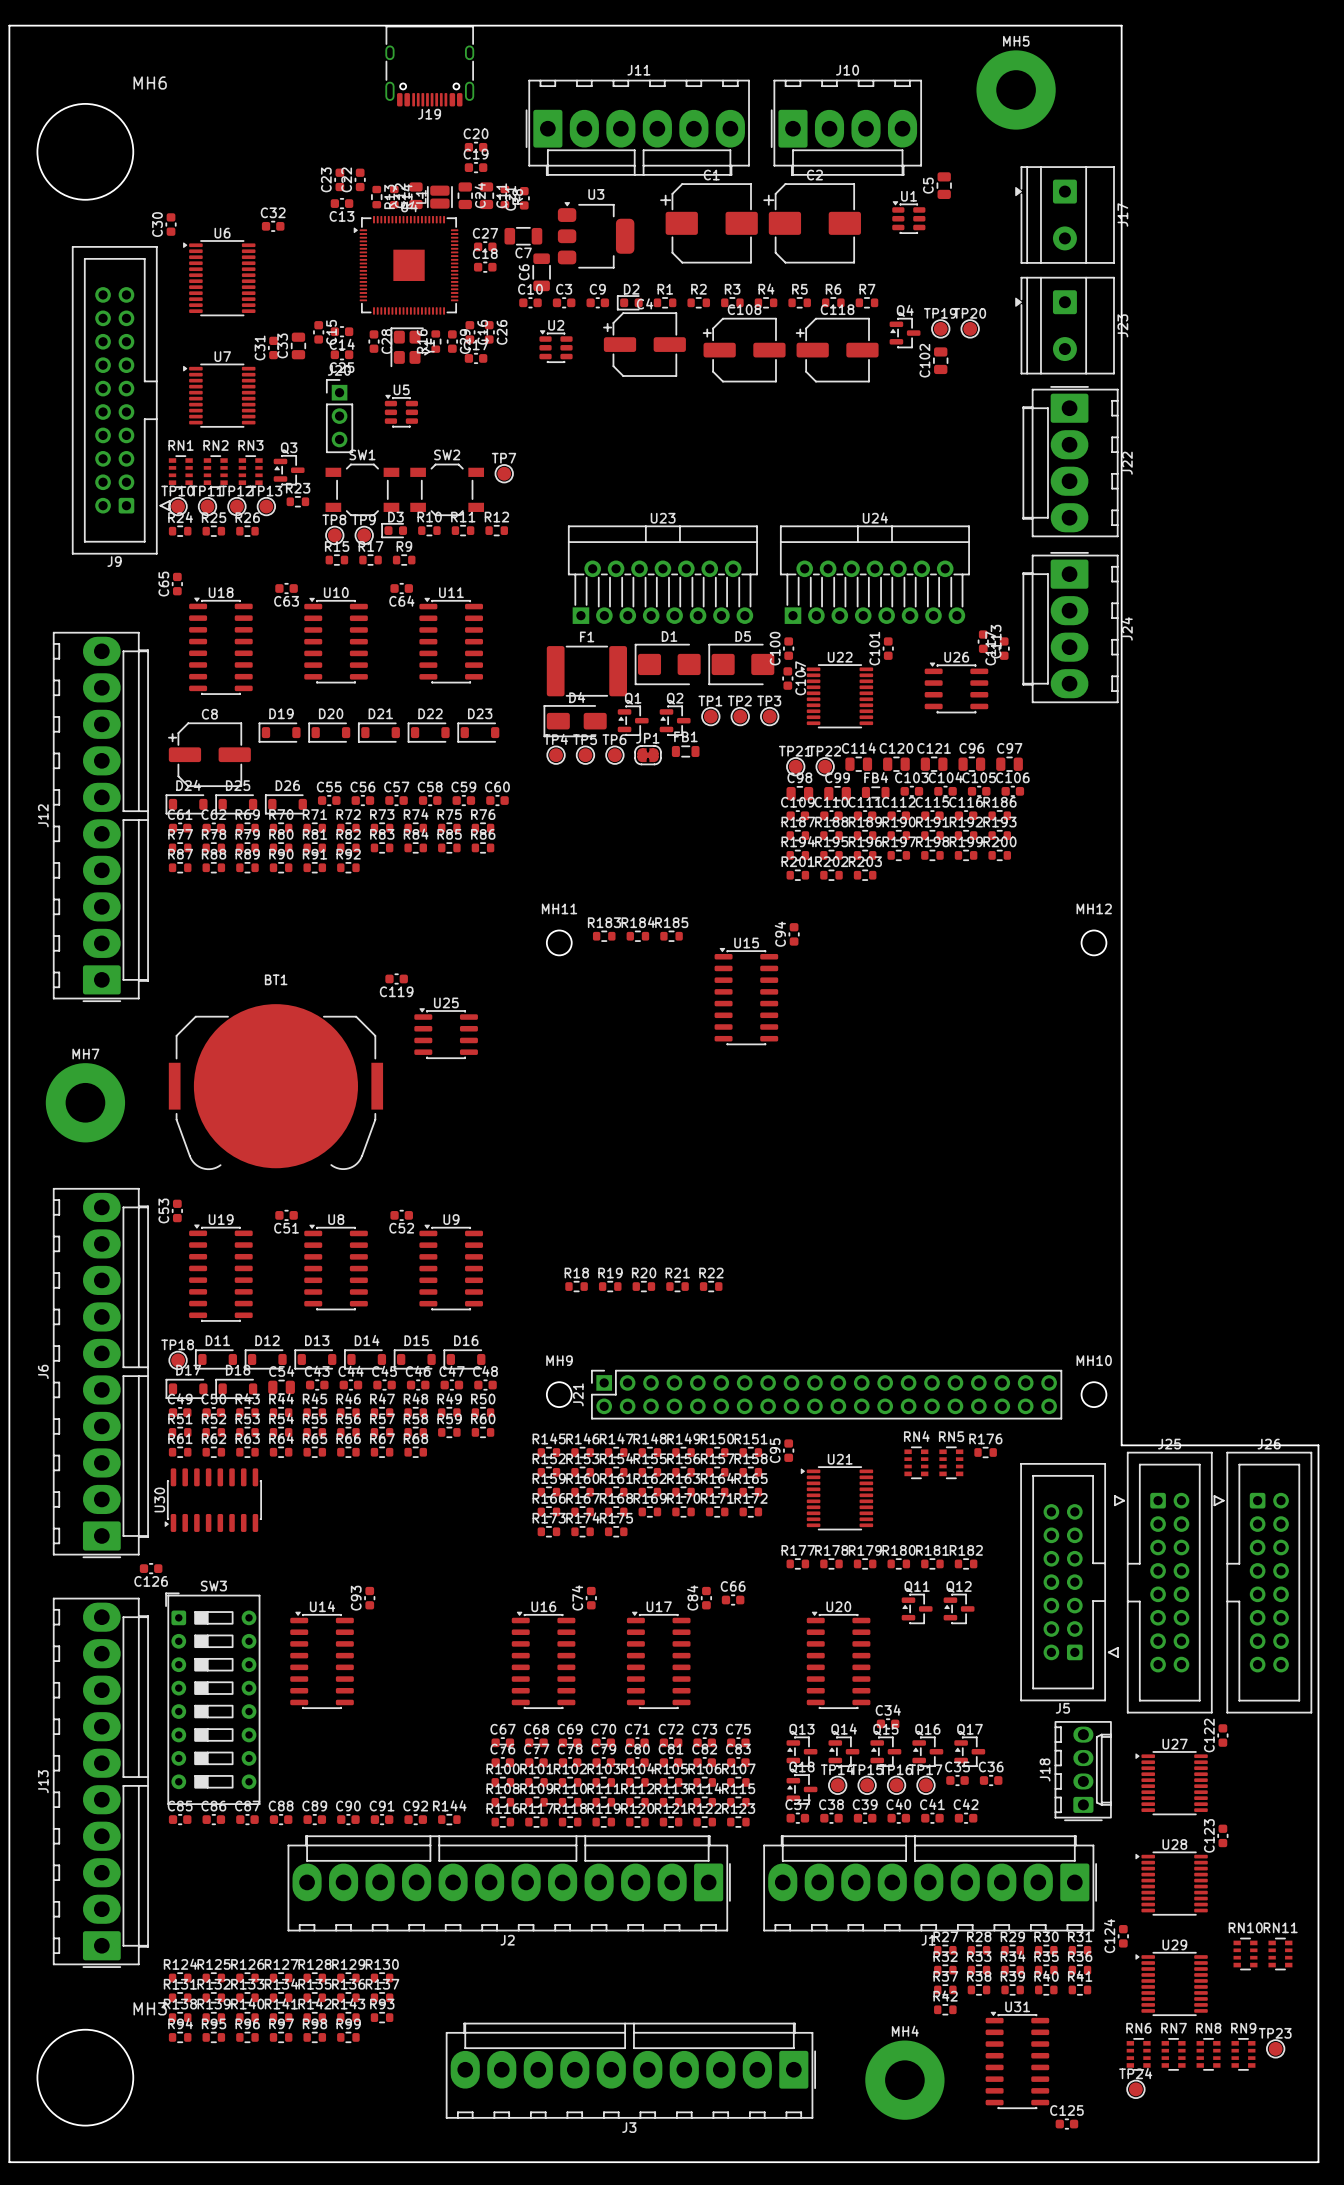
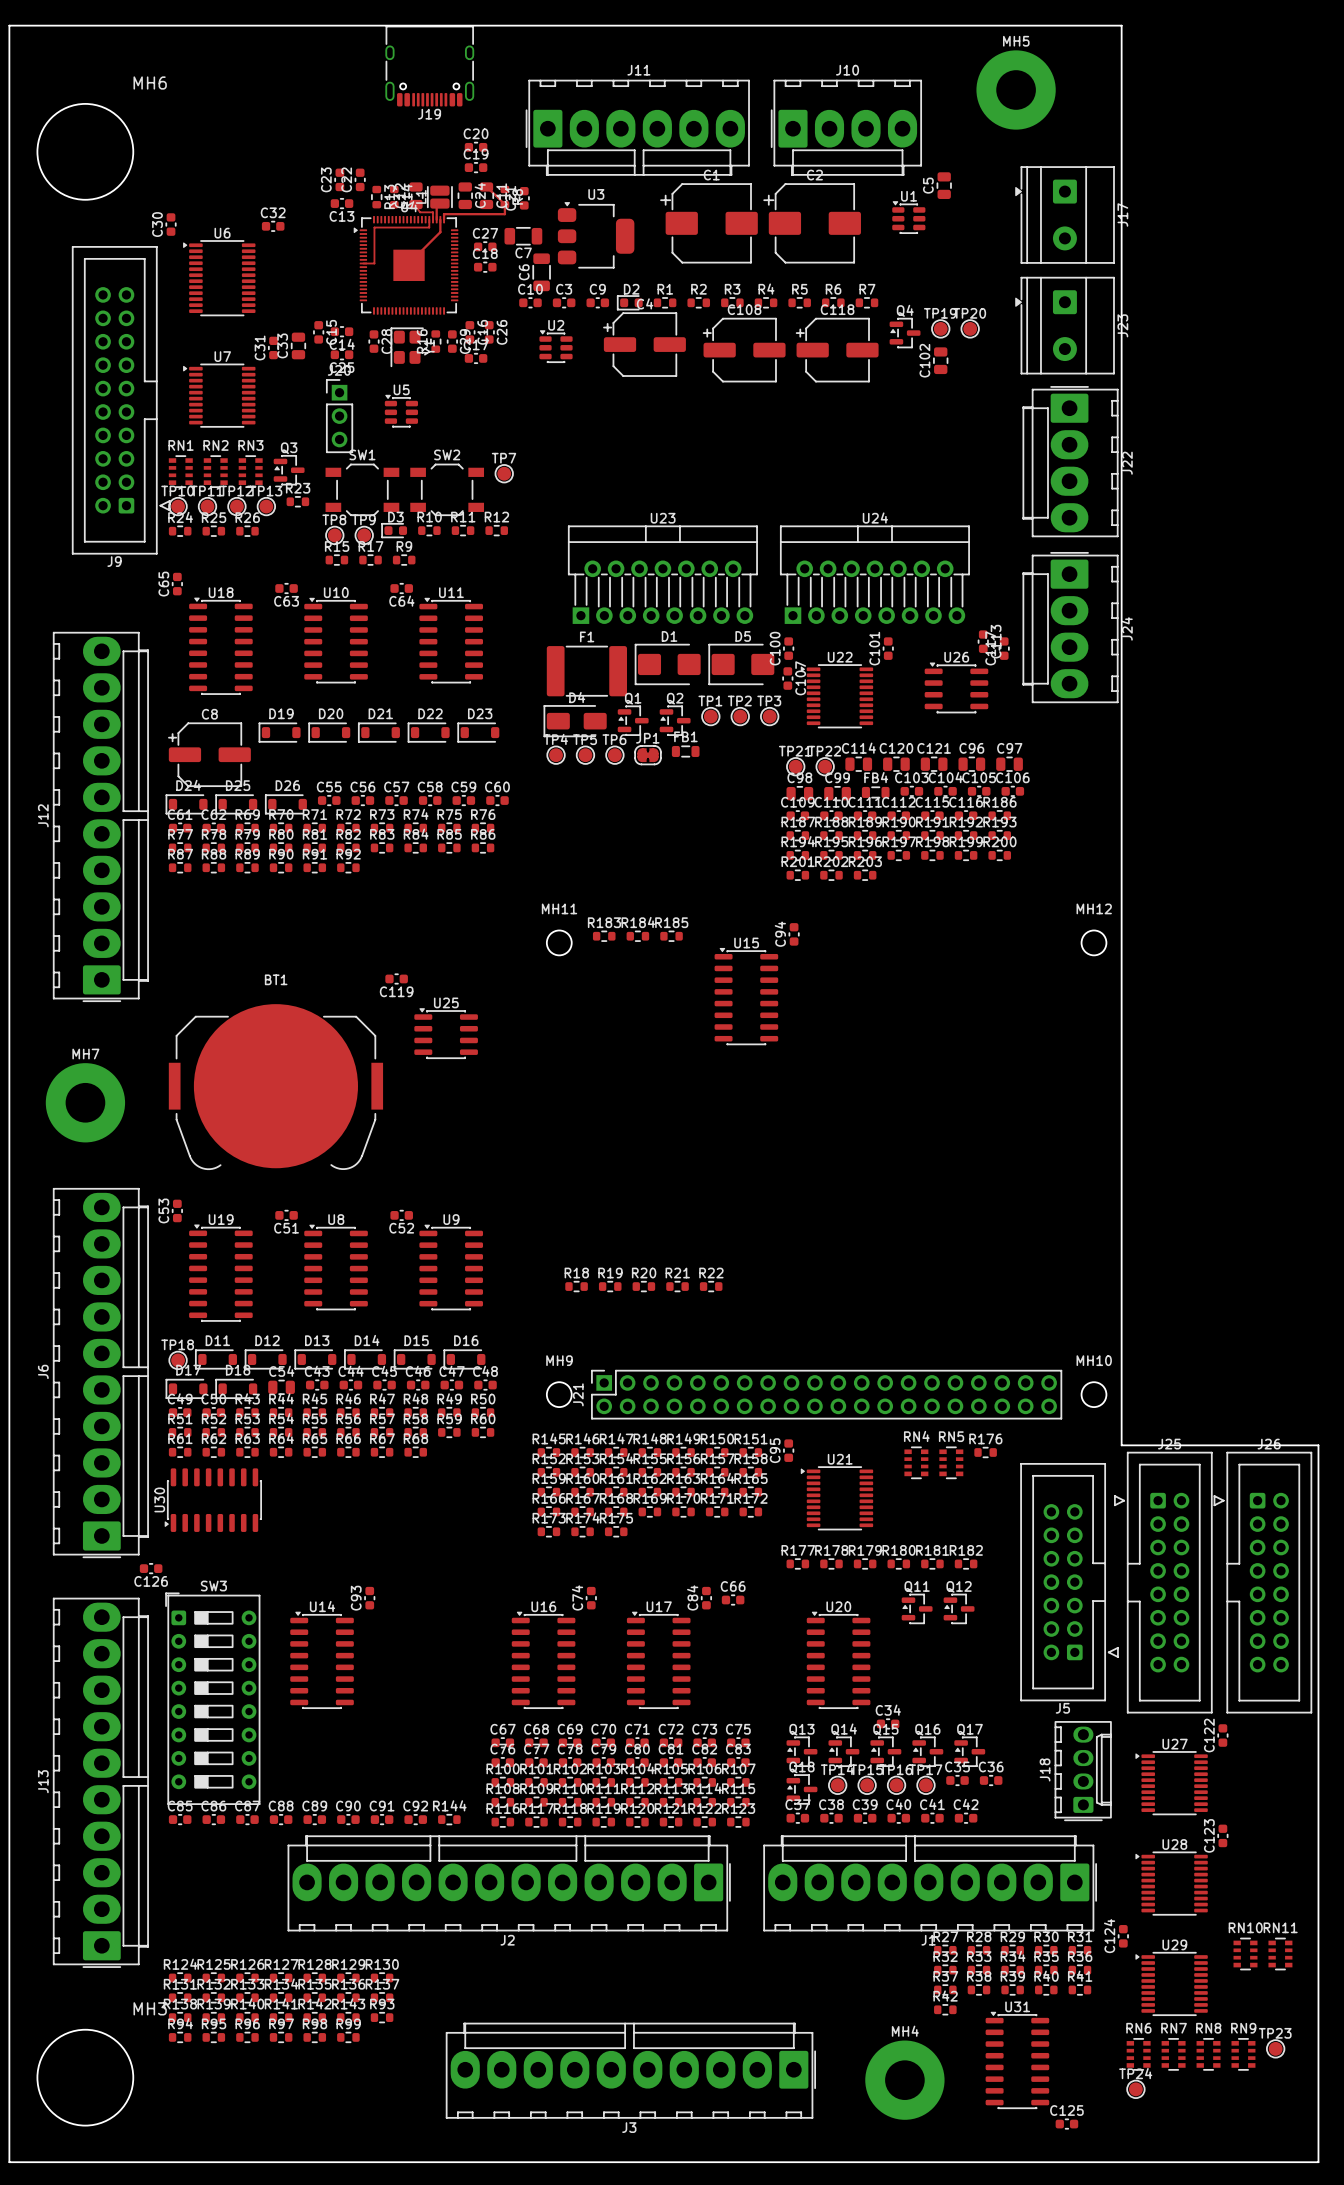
track: none -> (486, 186) (504, 204) (504, 214) (444, 214) (444, 219)
track: none -> (436, 203) (436, 219)
track: none -> (417, 209) (420, 212) (432, 212) (432, 219)
track: none -> (429, 219) (429, 227) (374, 227) (374, 263) (363, 263)
track: none -> (440, 219) (440, 232) (421, 251)

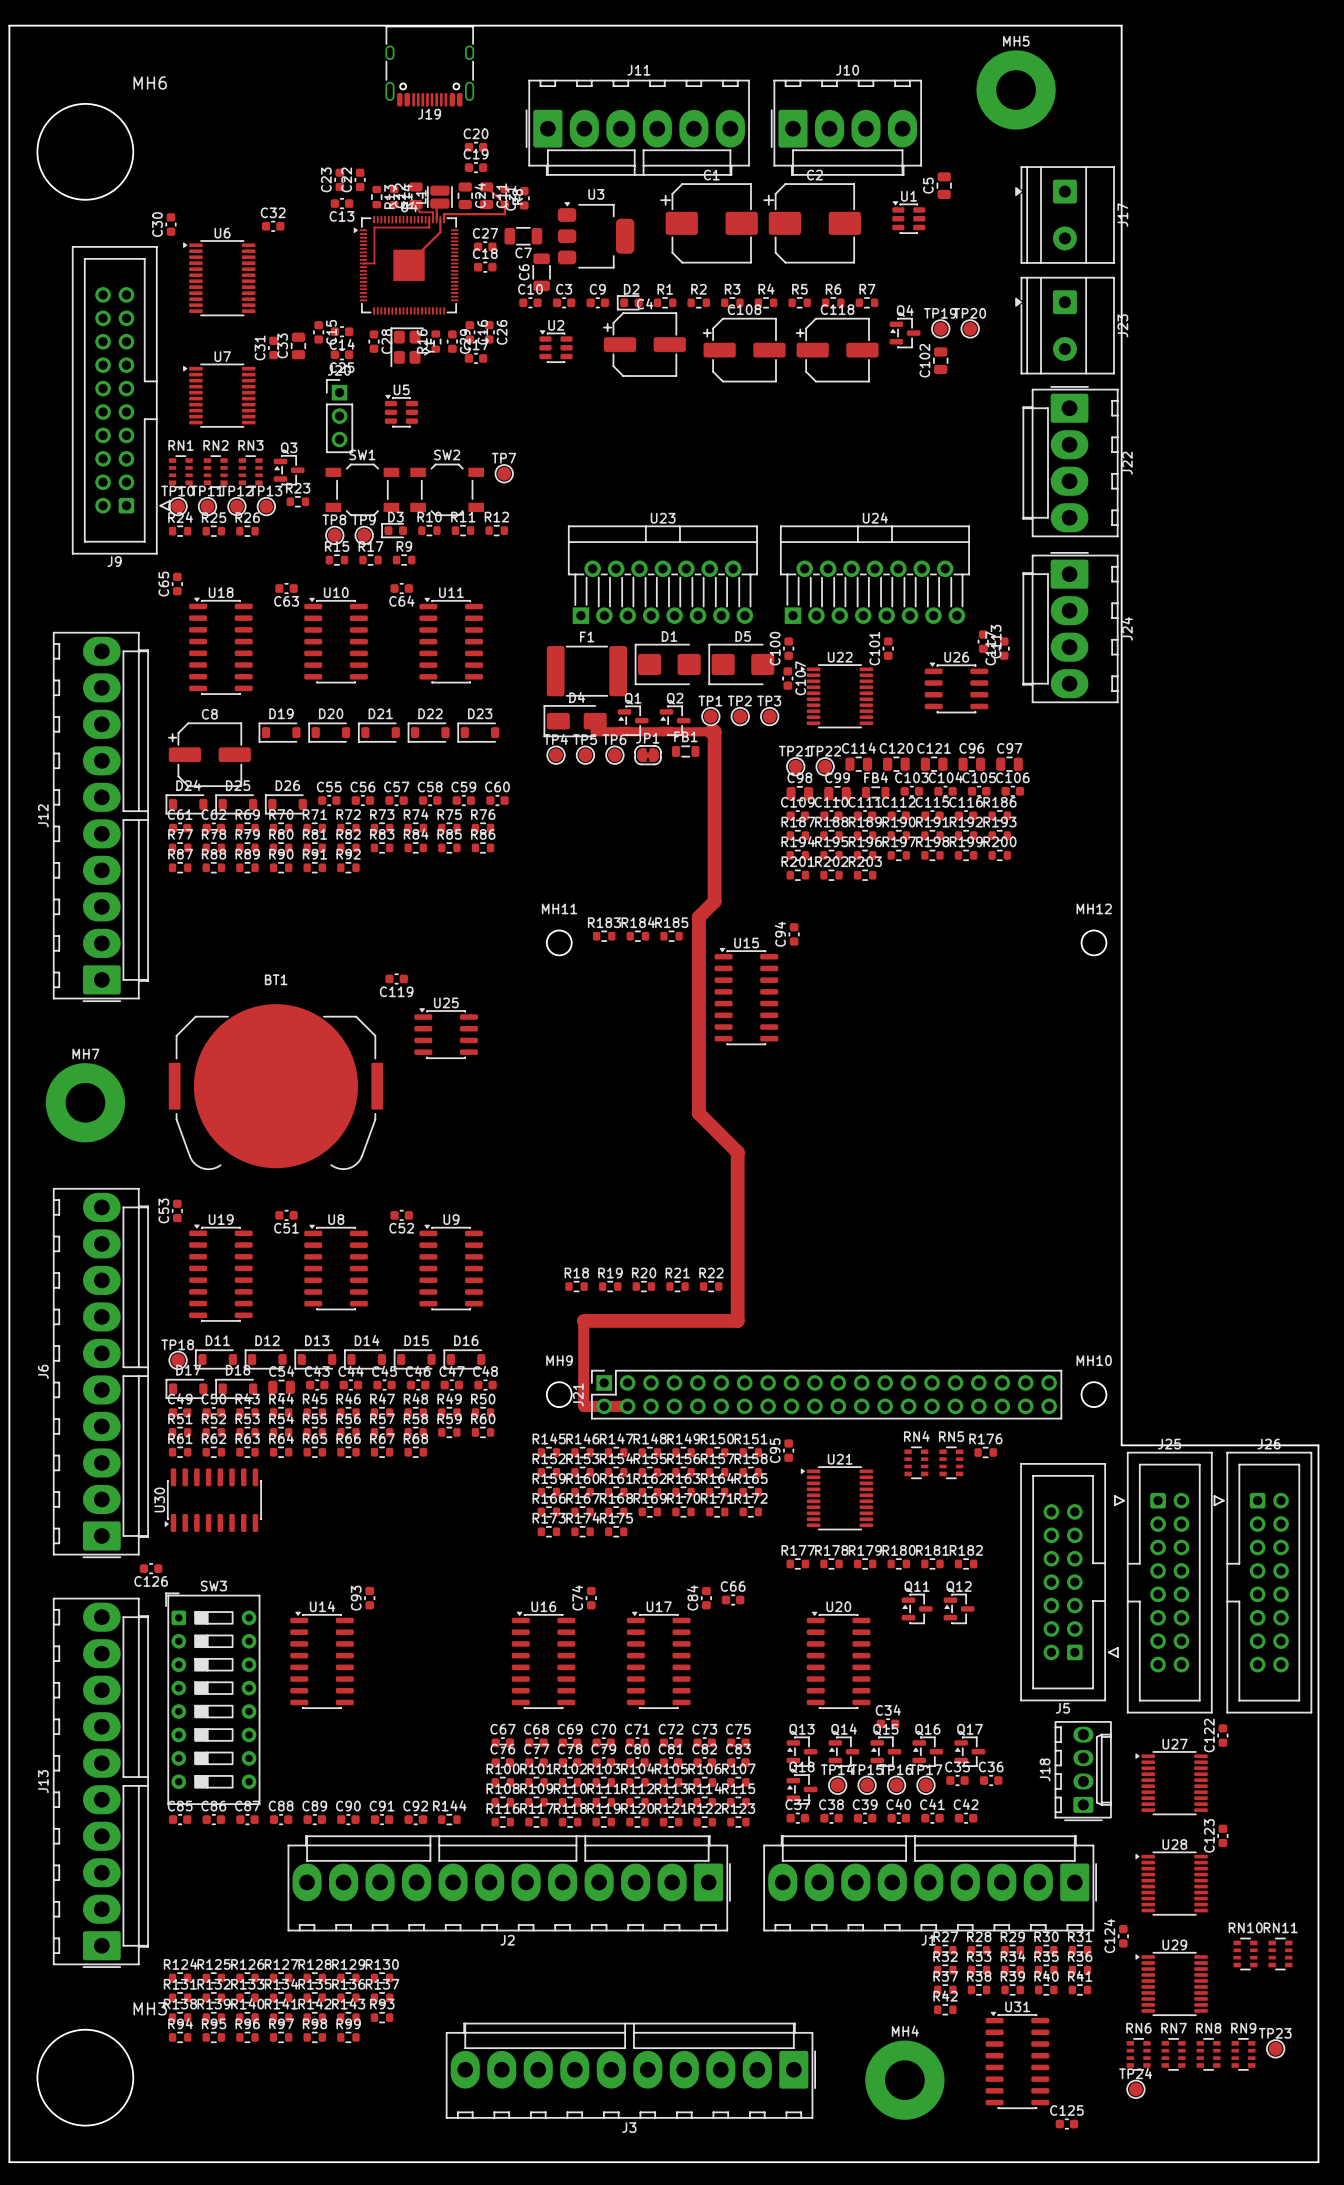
track: none -> (595, 721) (595, 731) (714, 731) (714, 901) (698, 917) (698, 1113) (737, 1152) (737, 1320) (583, 1320) (583, 1406) (627, 1406)

